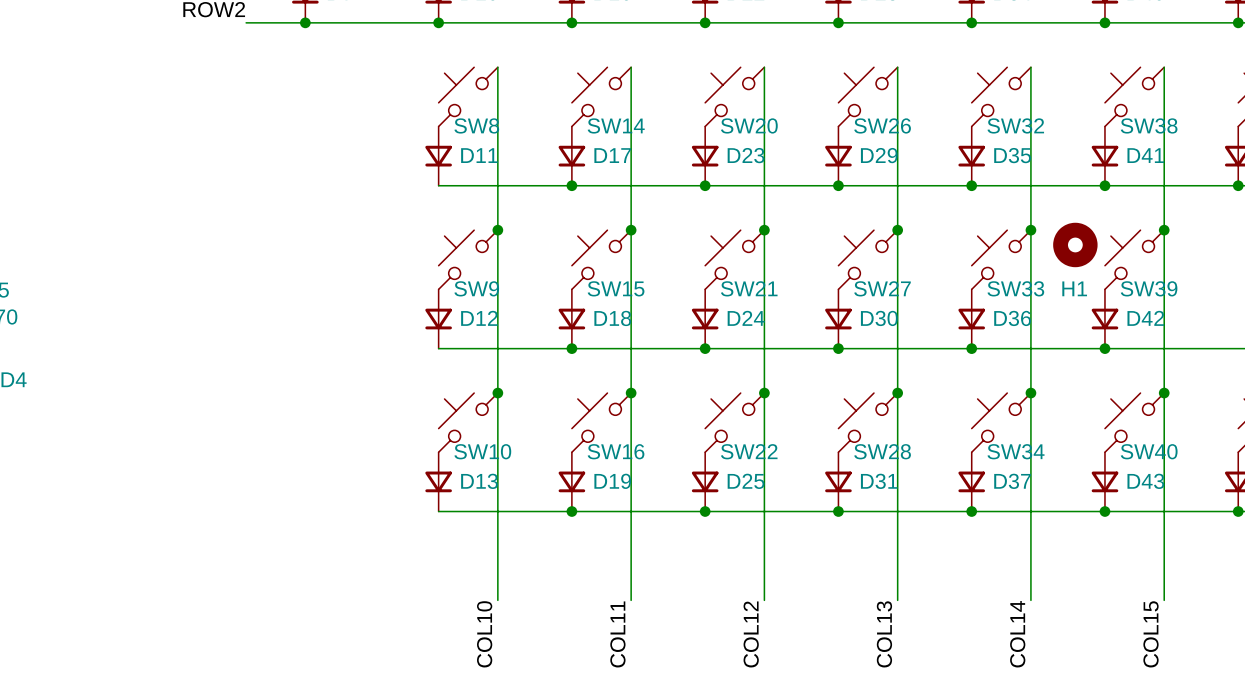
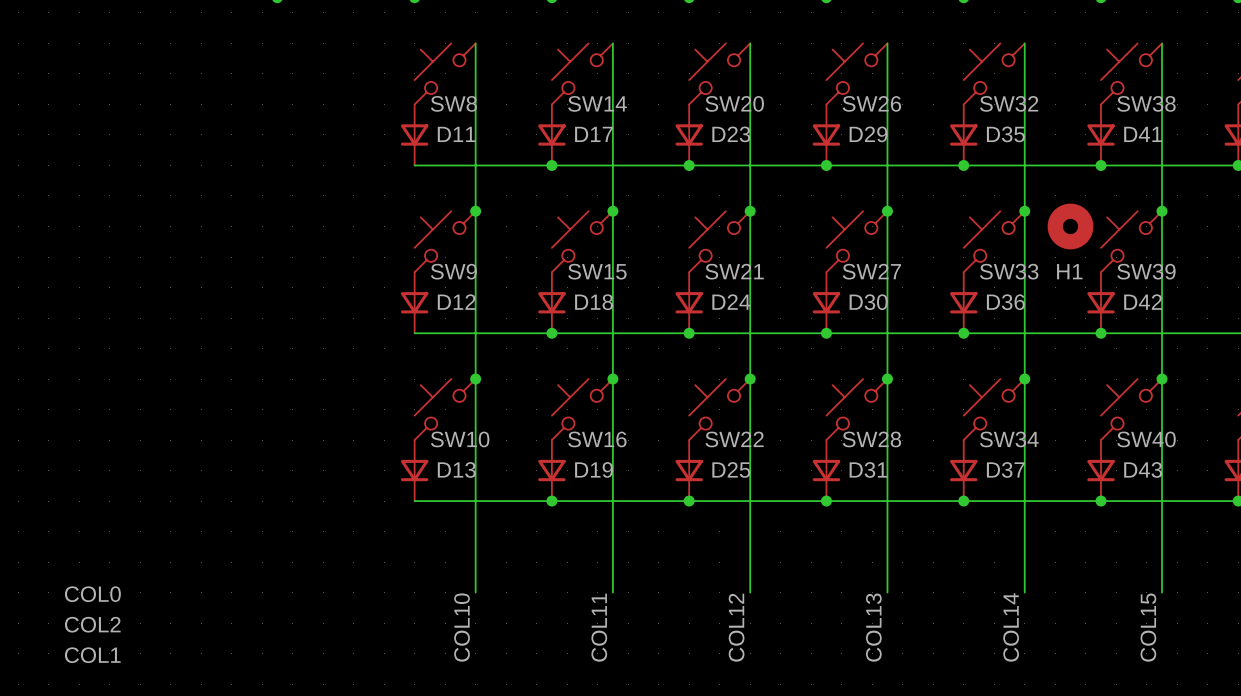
label: none -> COL0 (92, 594)
label: none -> COL2 (92, 624)
label: none -> COL1 (92, 655)

